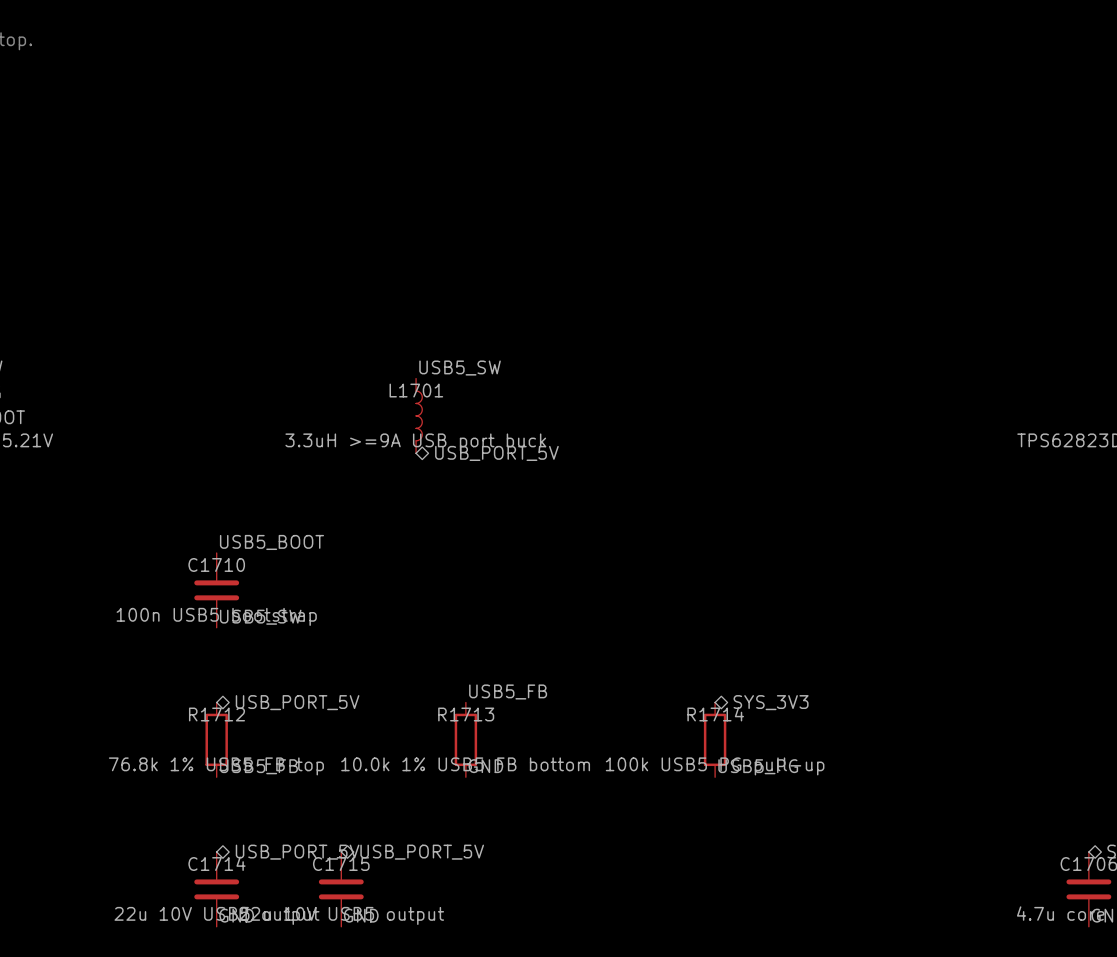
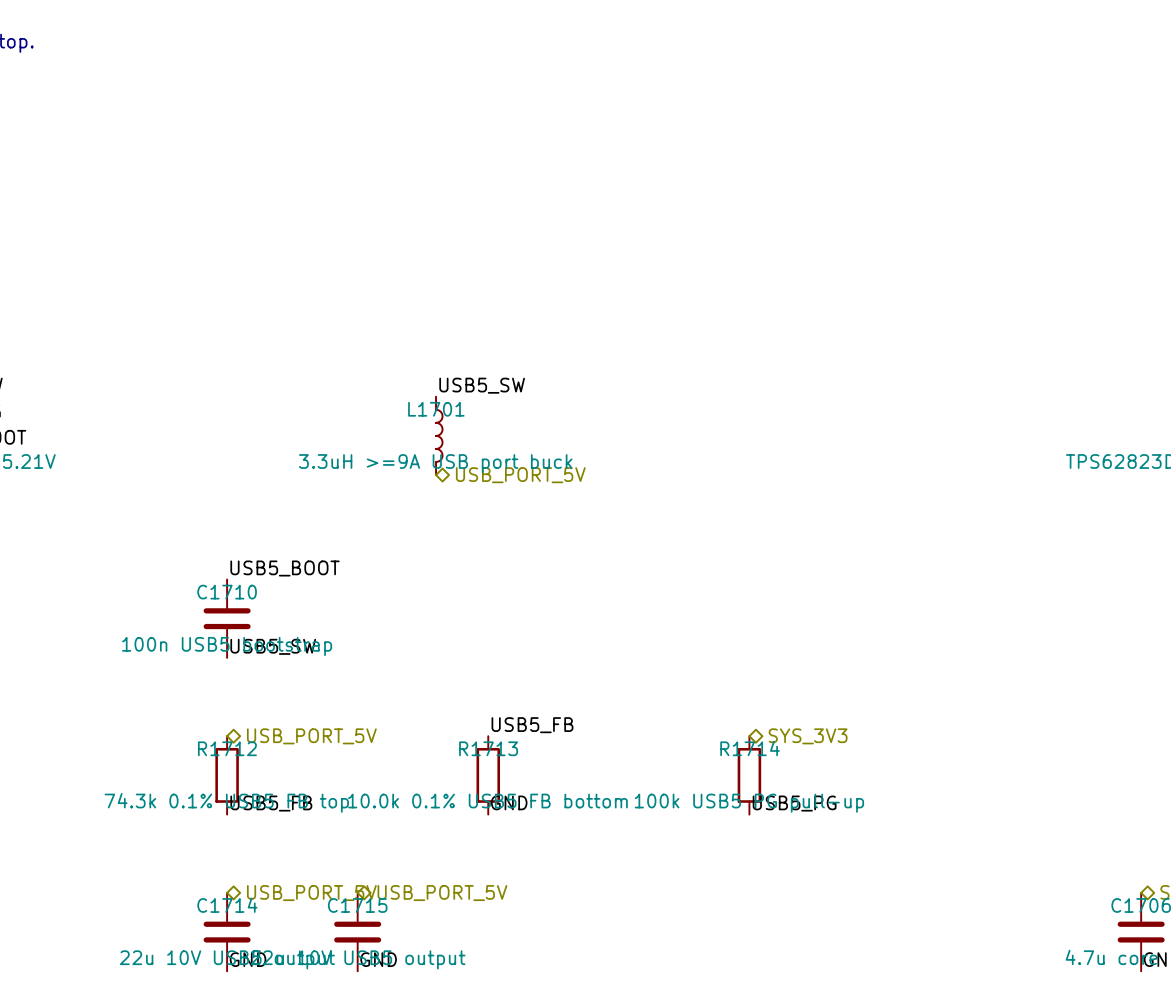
R1713 value: 10.0k 1% USB5 FB bottom (465, 764) -> 10.0k 0.1% USB5 FB bottom (487, 801)
R1712 value: 76.8k 1% USB5 FB top (216, 766) -> 74.3k 0.1% USB5 FB top (226, 802)

